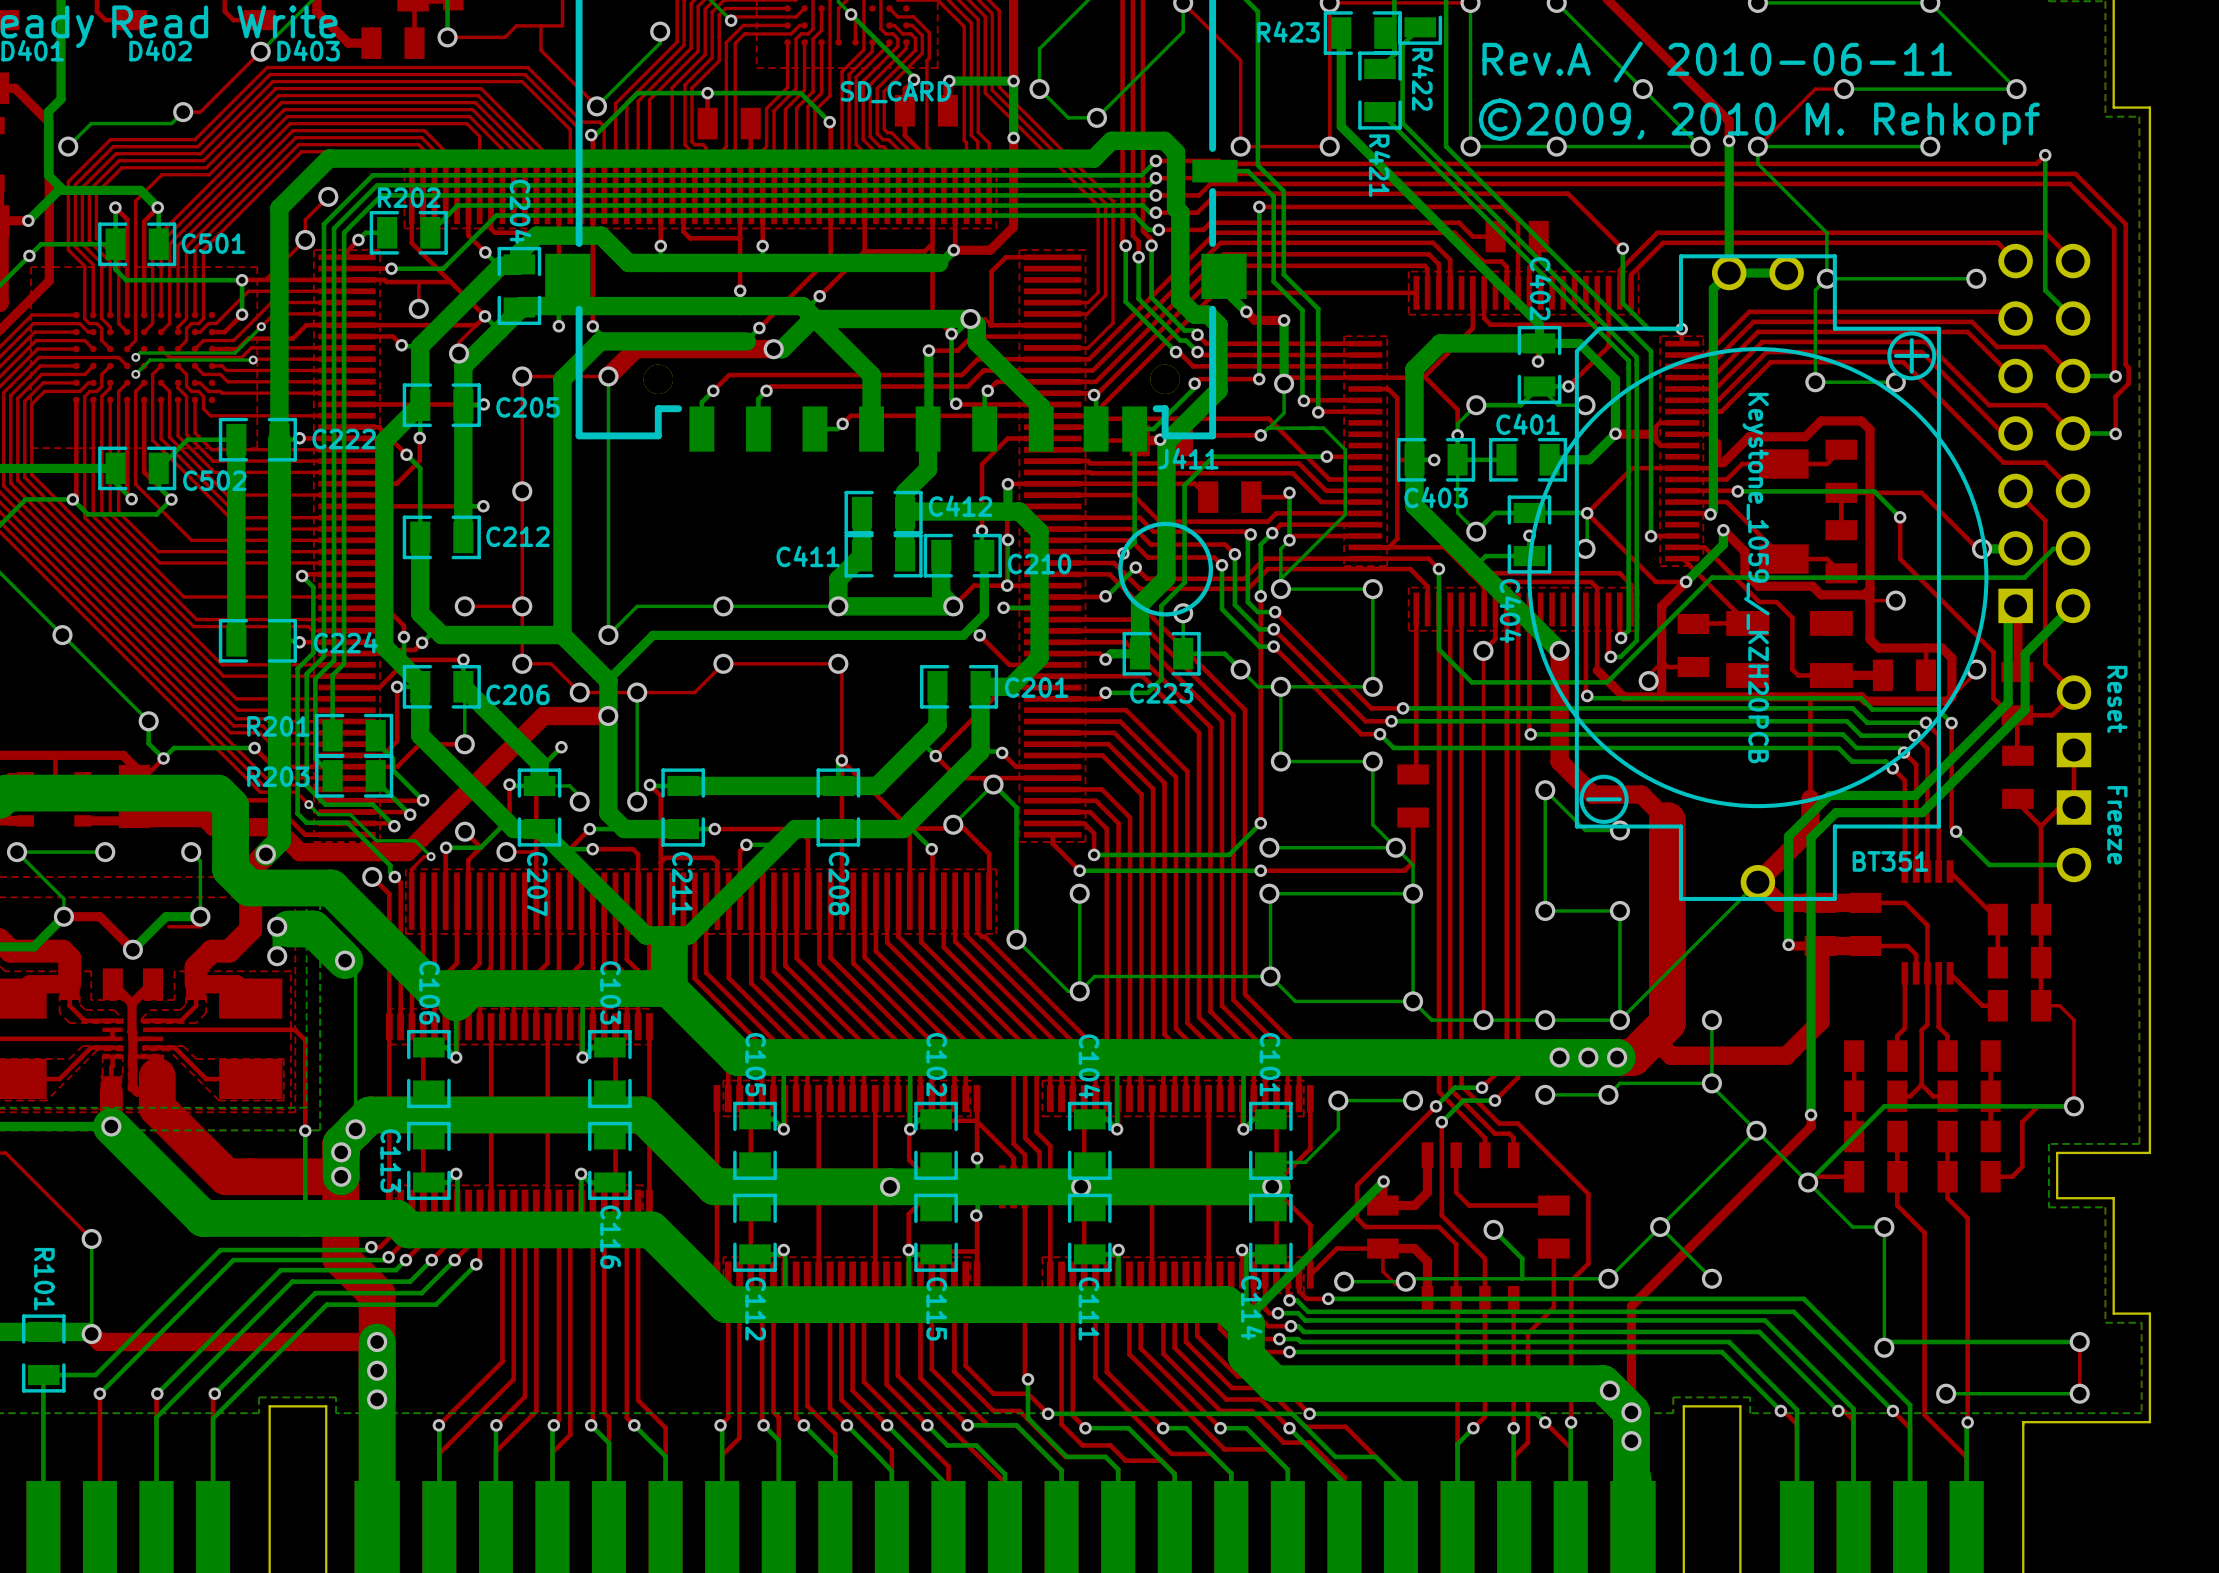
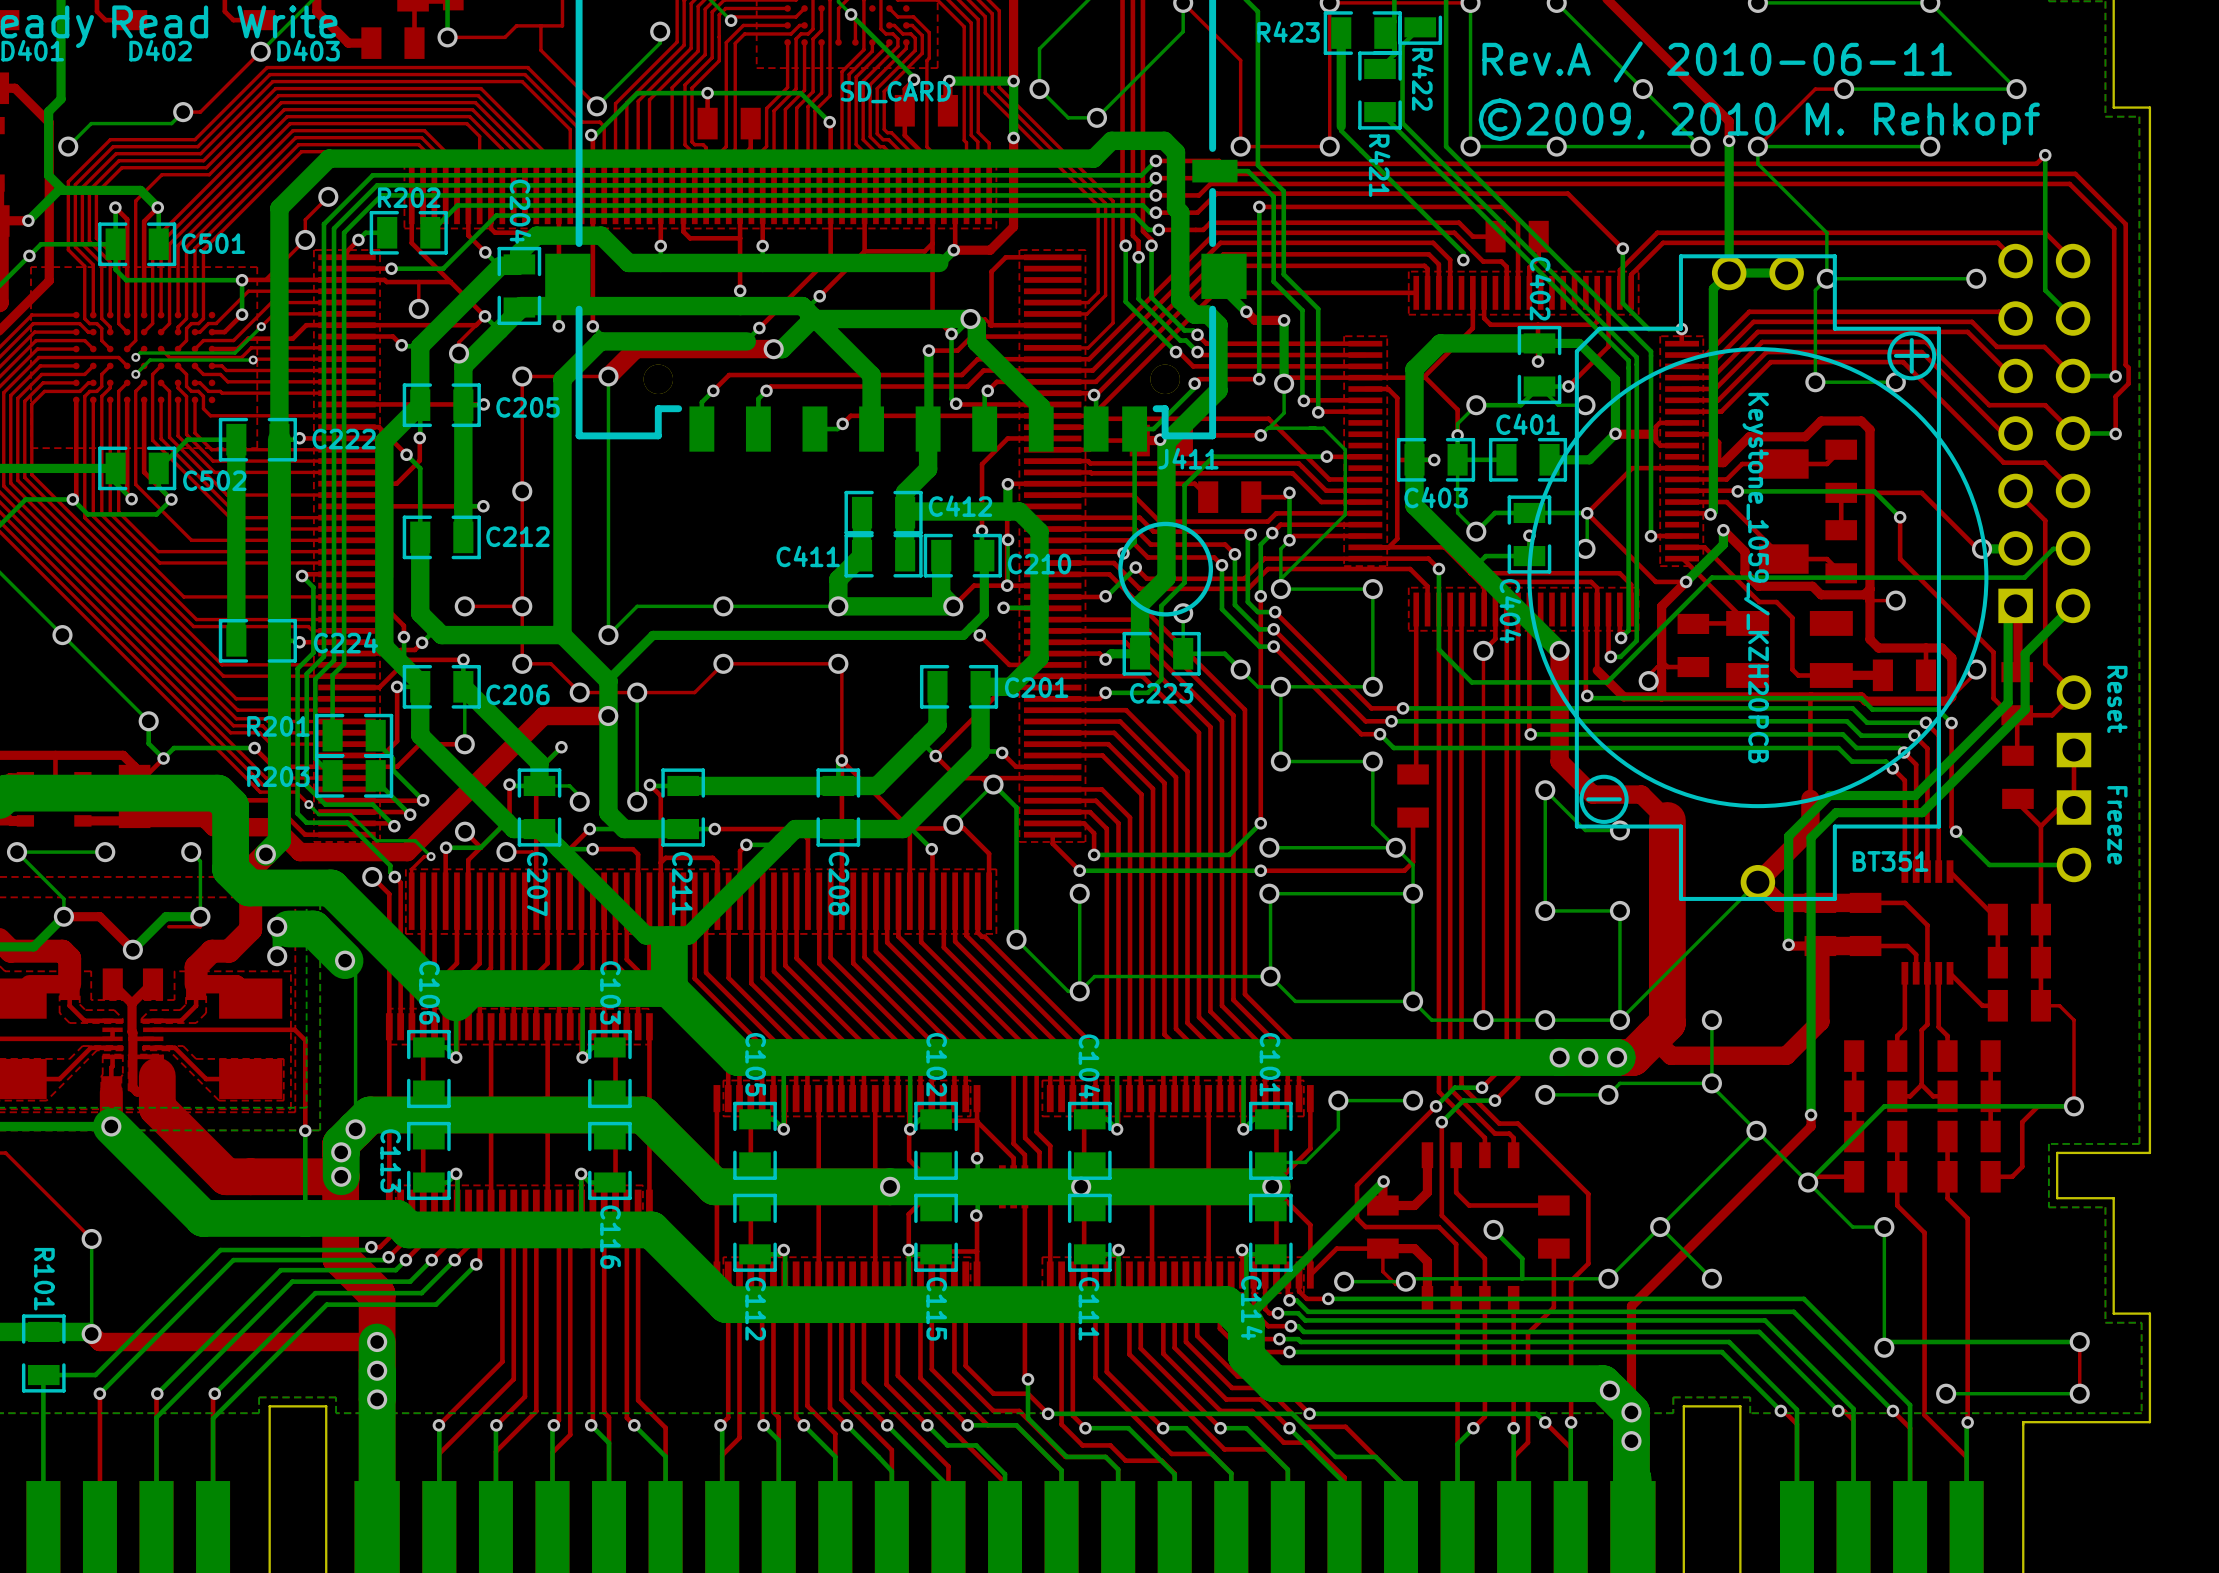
bottom track: (1341, 126) (1539, 324) (1539, 343) -> (1341, 126) (1341, 130) (1463, 252) (1463, 260)
via: none -> (1463, 260)

